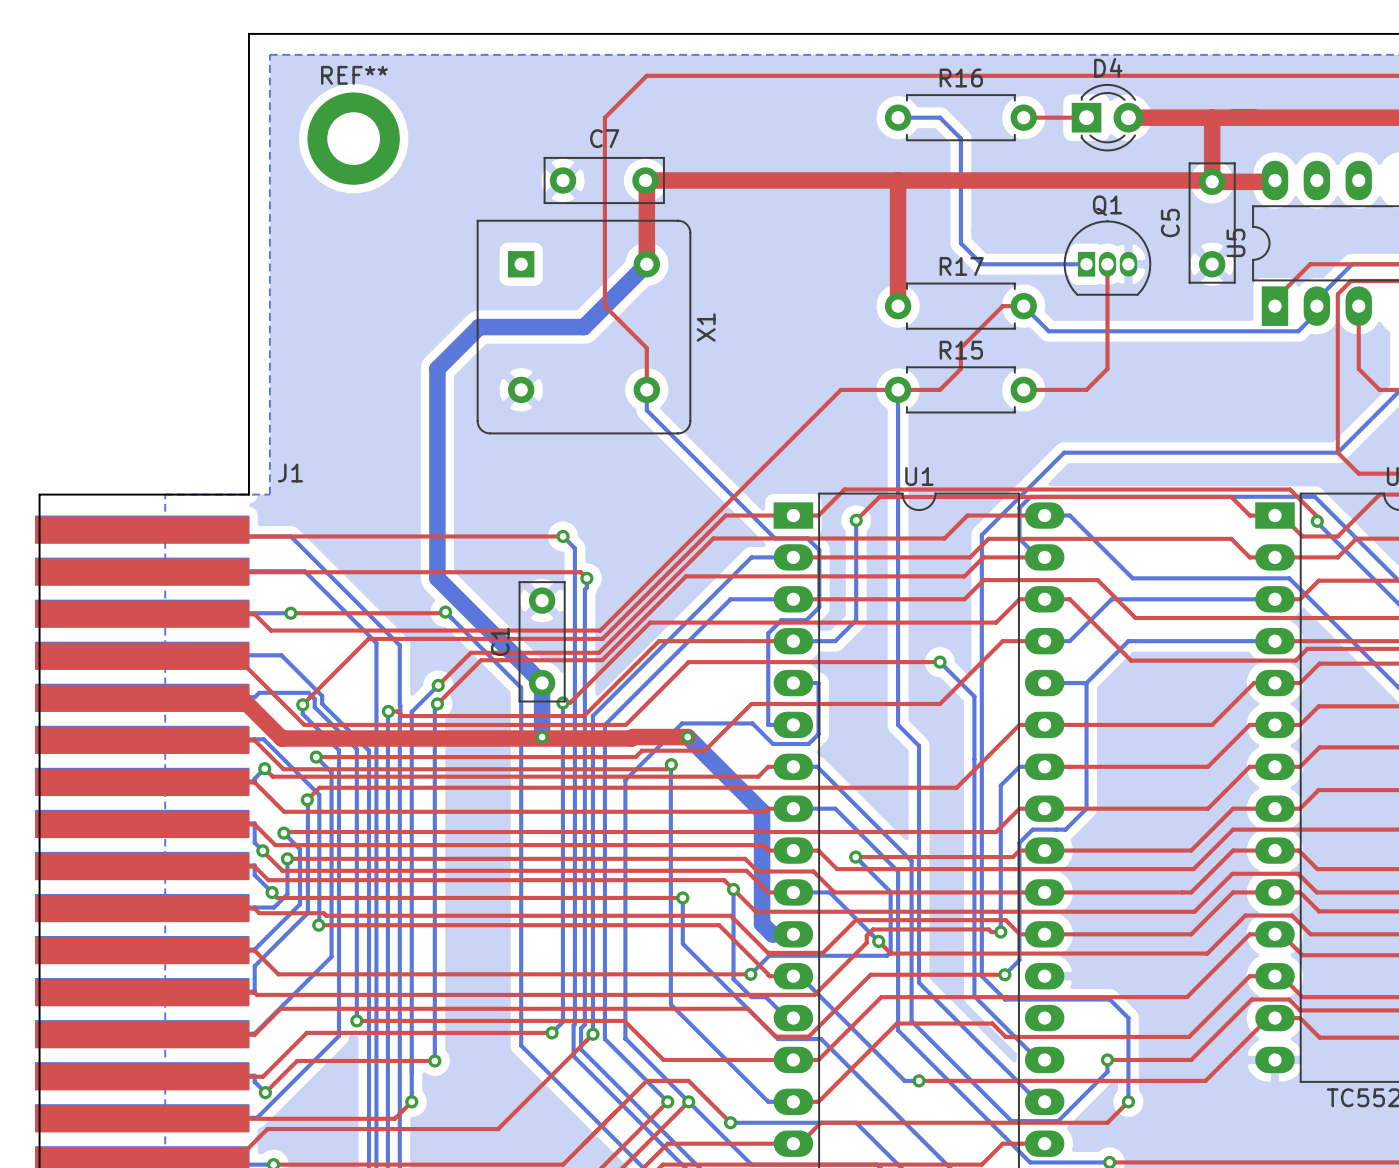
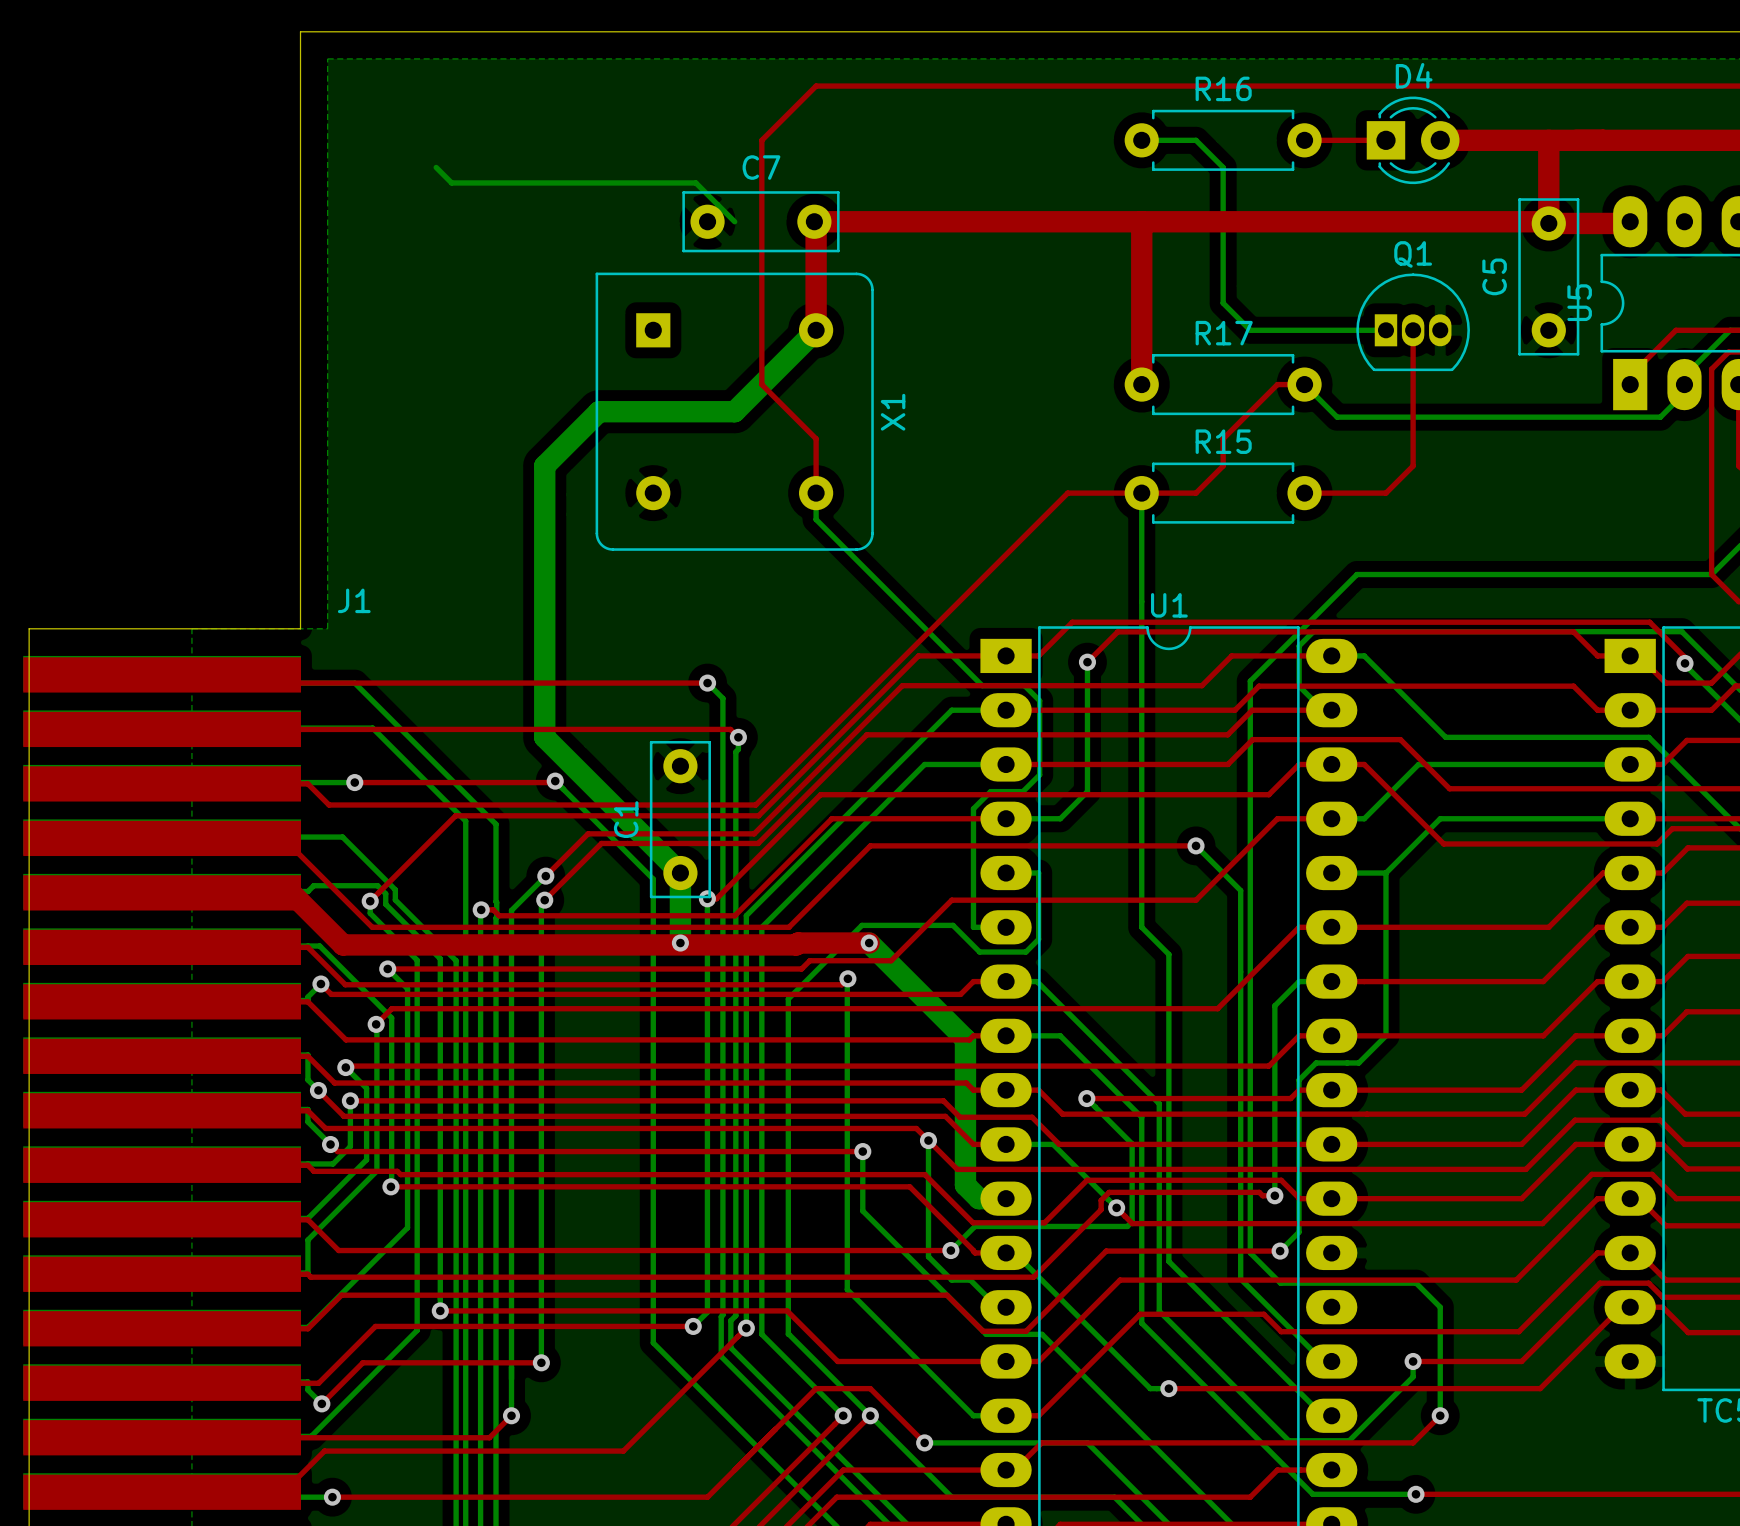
bottom track: none -> (436, 167) (451, 182) (695, 182) (734, 221)
REF**: (353, 138) -> none

